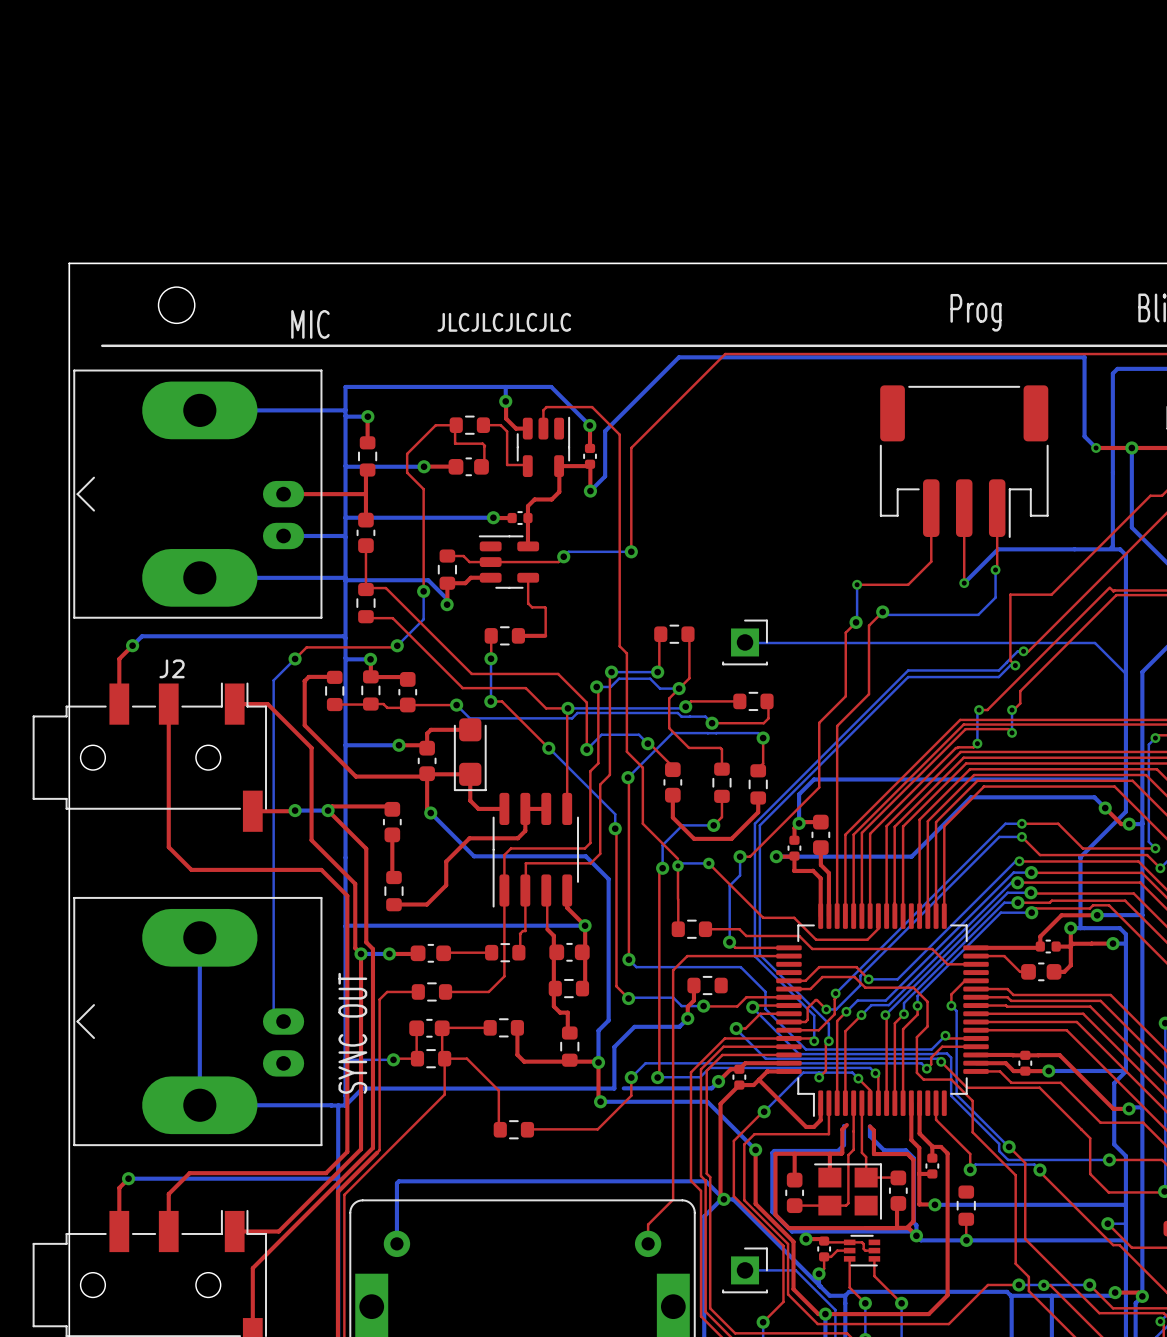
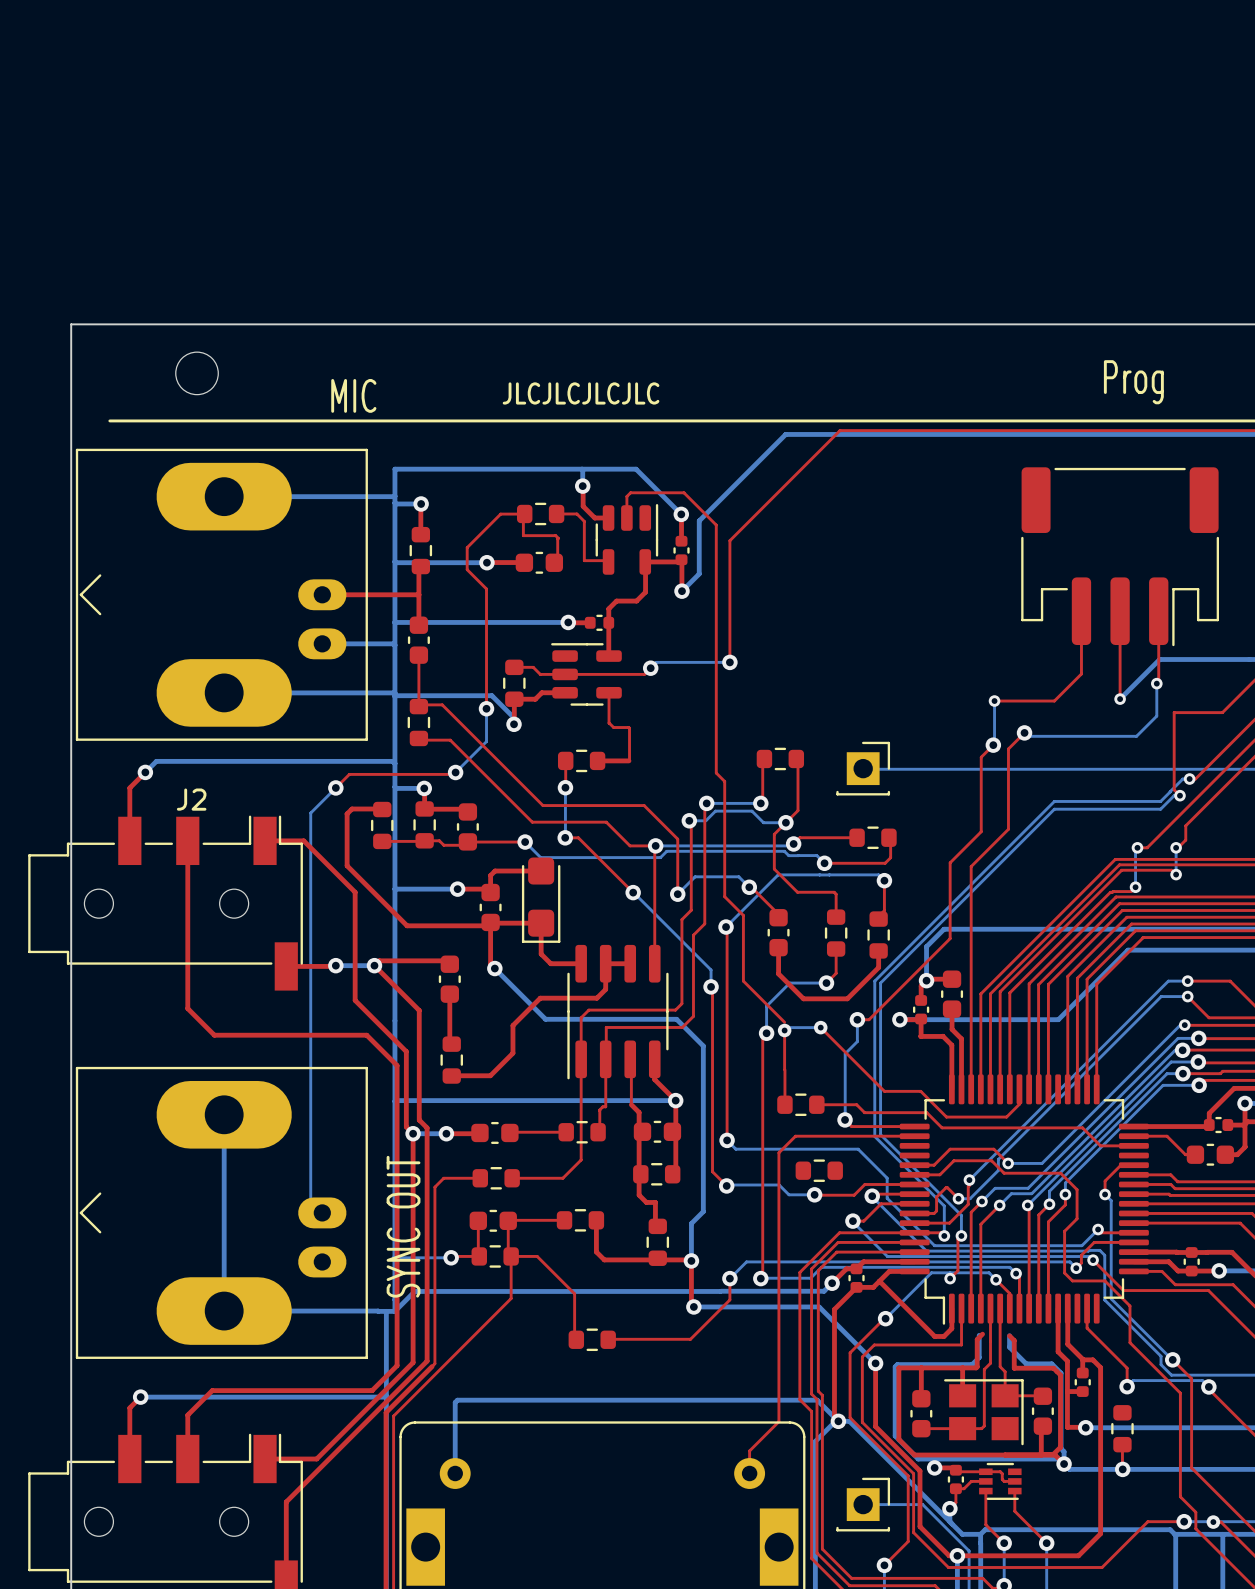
top track: (693, 985) (693, 1000) (687, 1006) (687, 1018) -> none
bottom track: (687, 1018) (679, 1026) (634, 1026) (614, 1047) (614, 1088) -> (720, 1291) (710, 1291)
via: (687, 1018) -> none

